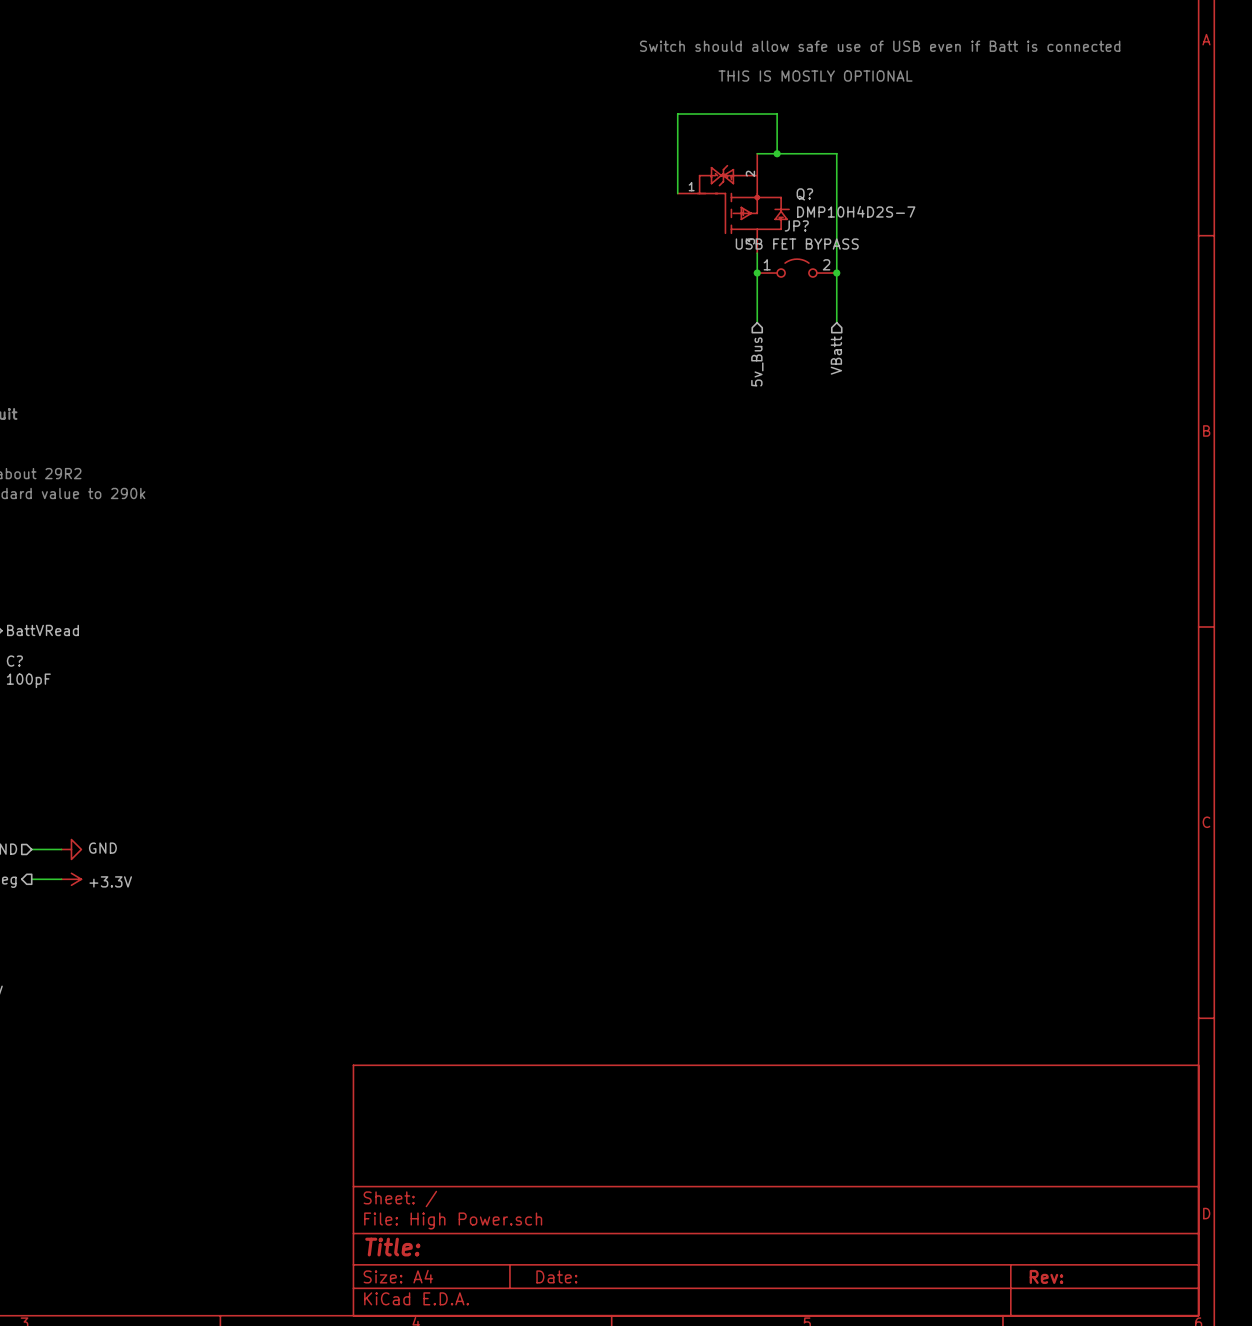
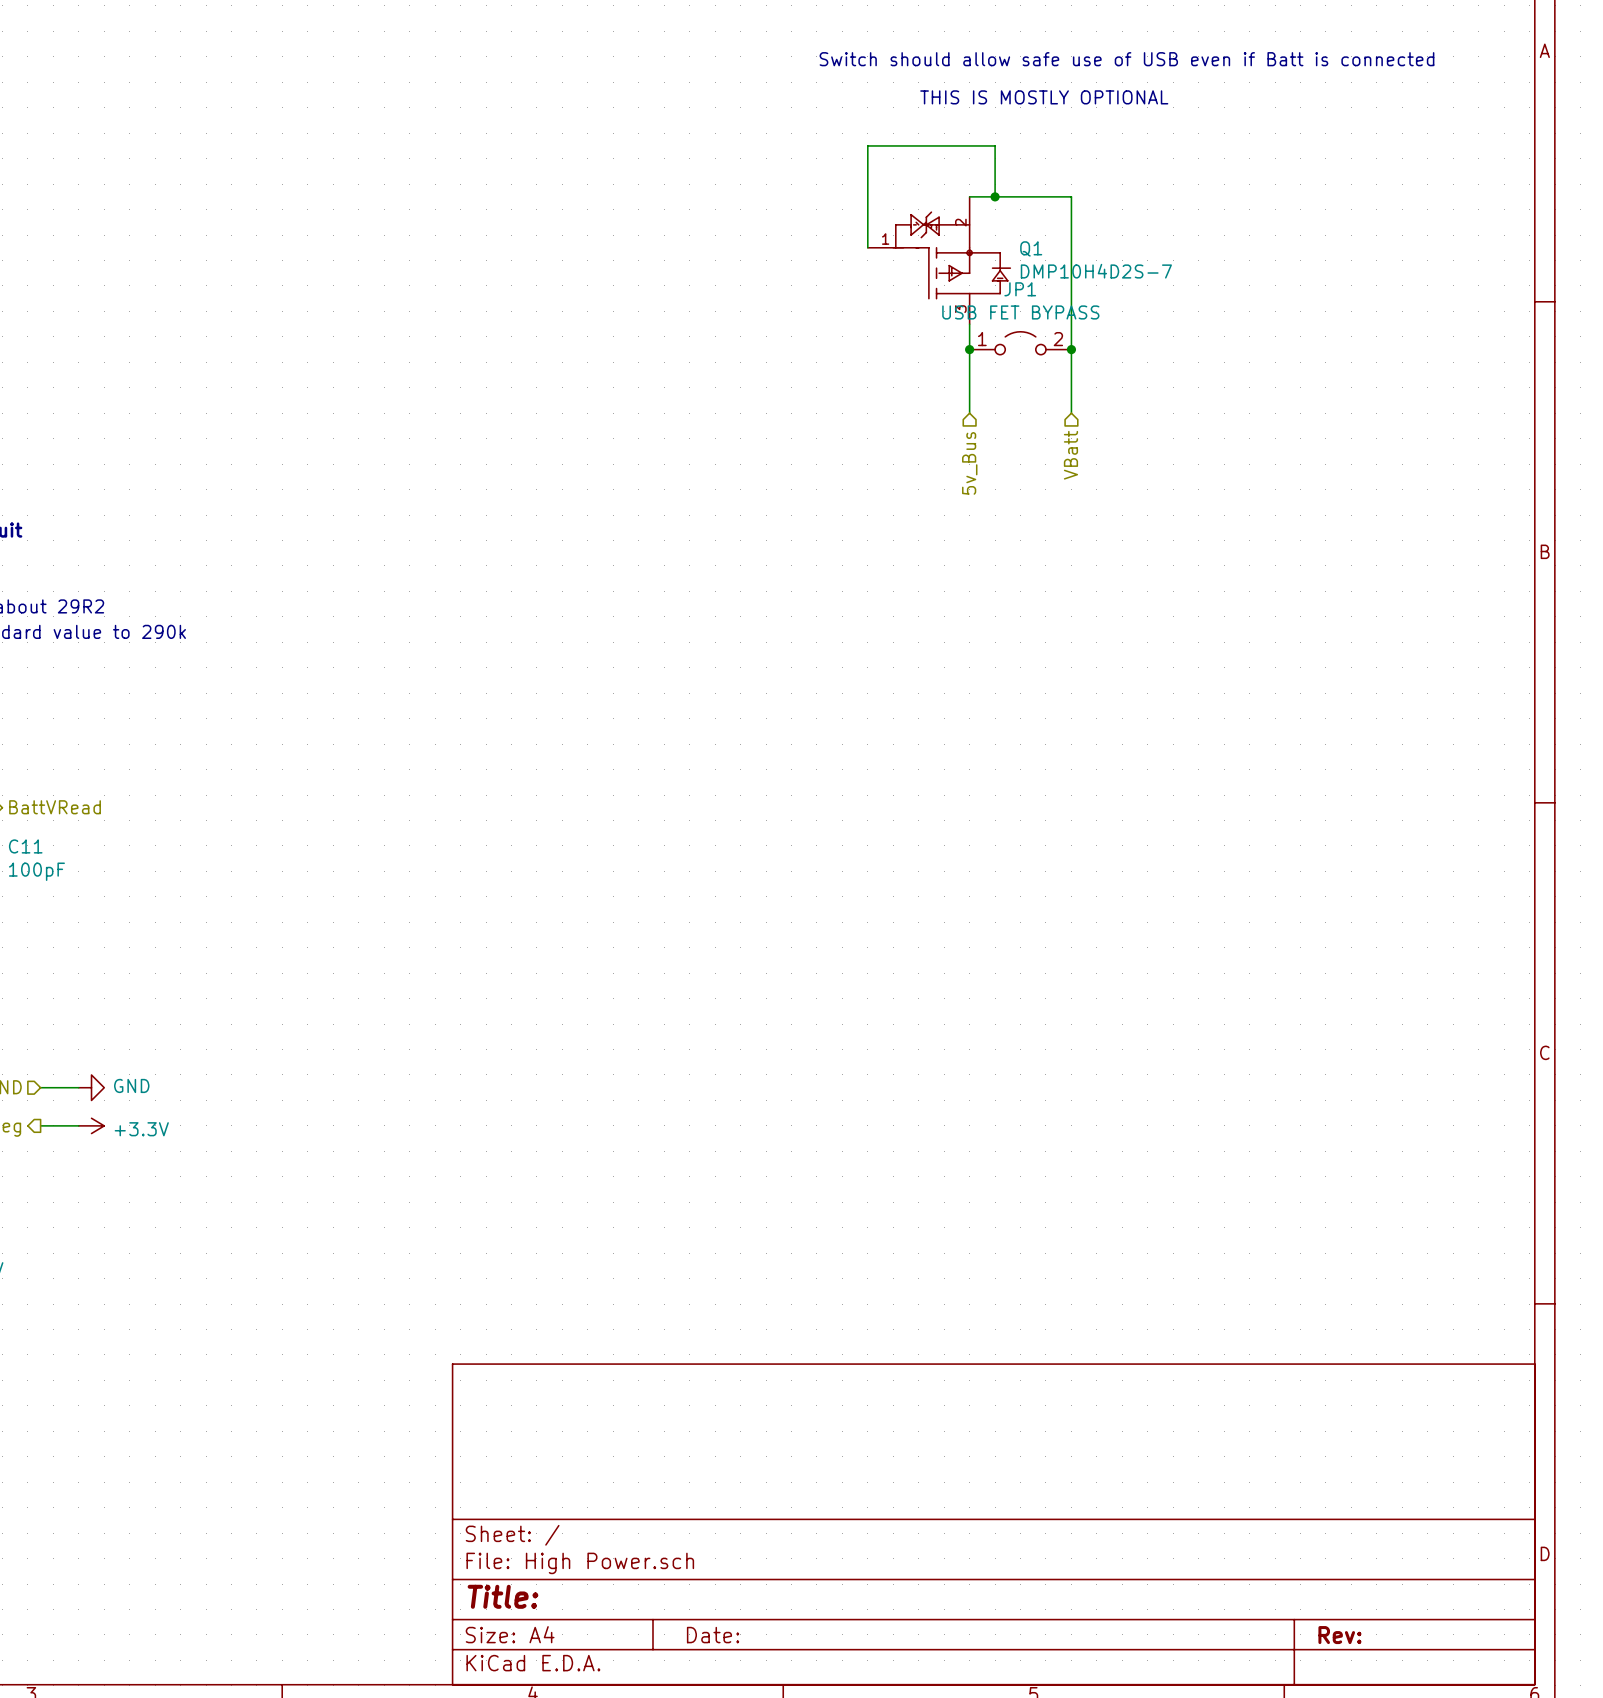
Q? name: Q? (804, 194) -> Q1 (1031, 248)
JP? name: JP? (796, 225) -> JP1 (1020, 289)
C? name: C? (14, 661) -> C11 (25, 846)

